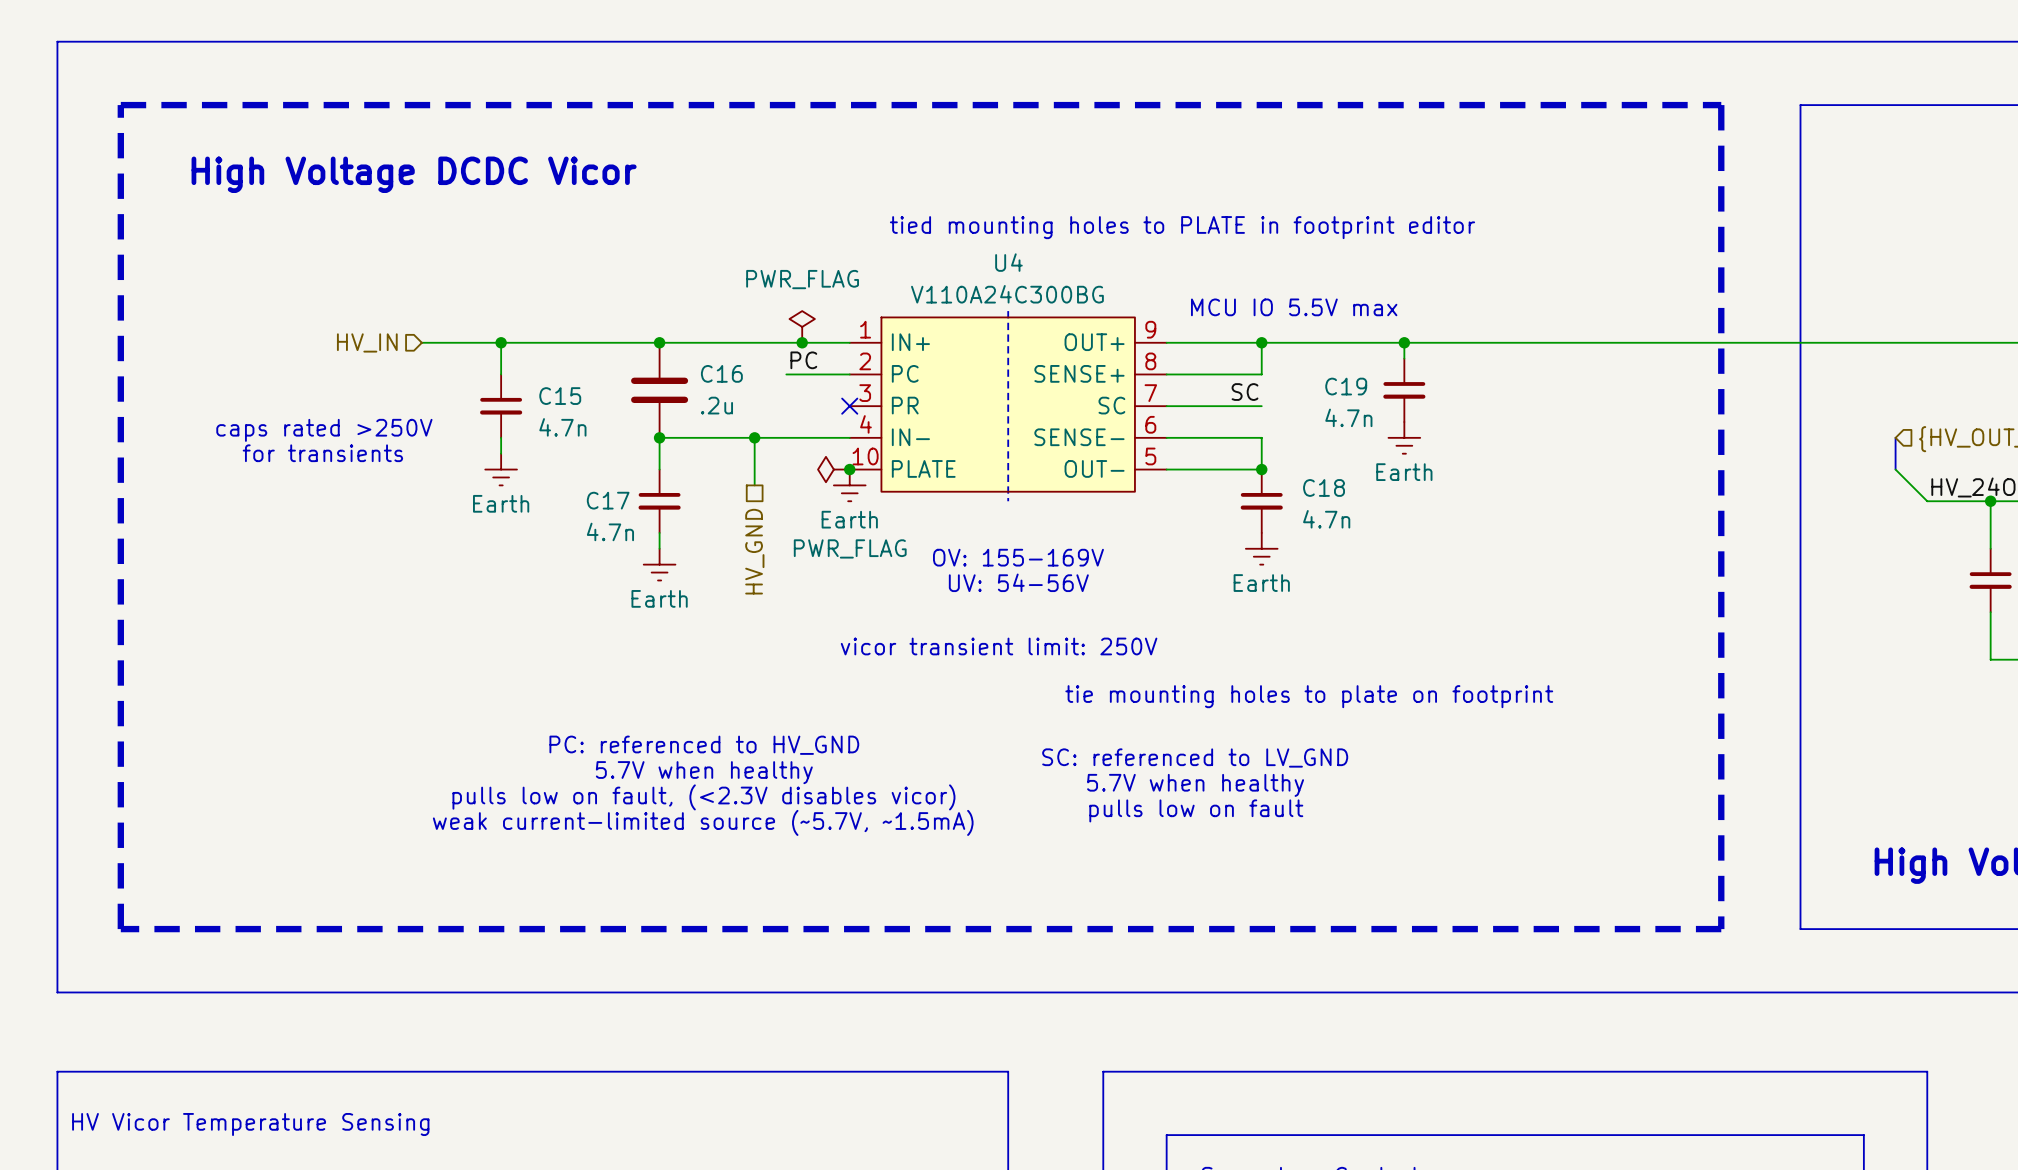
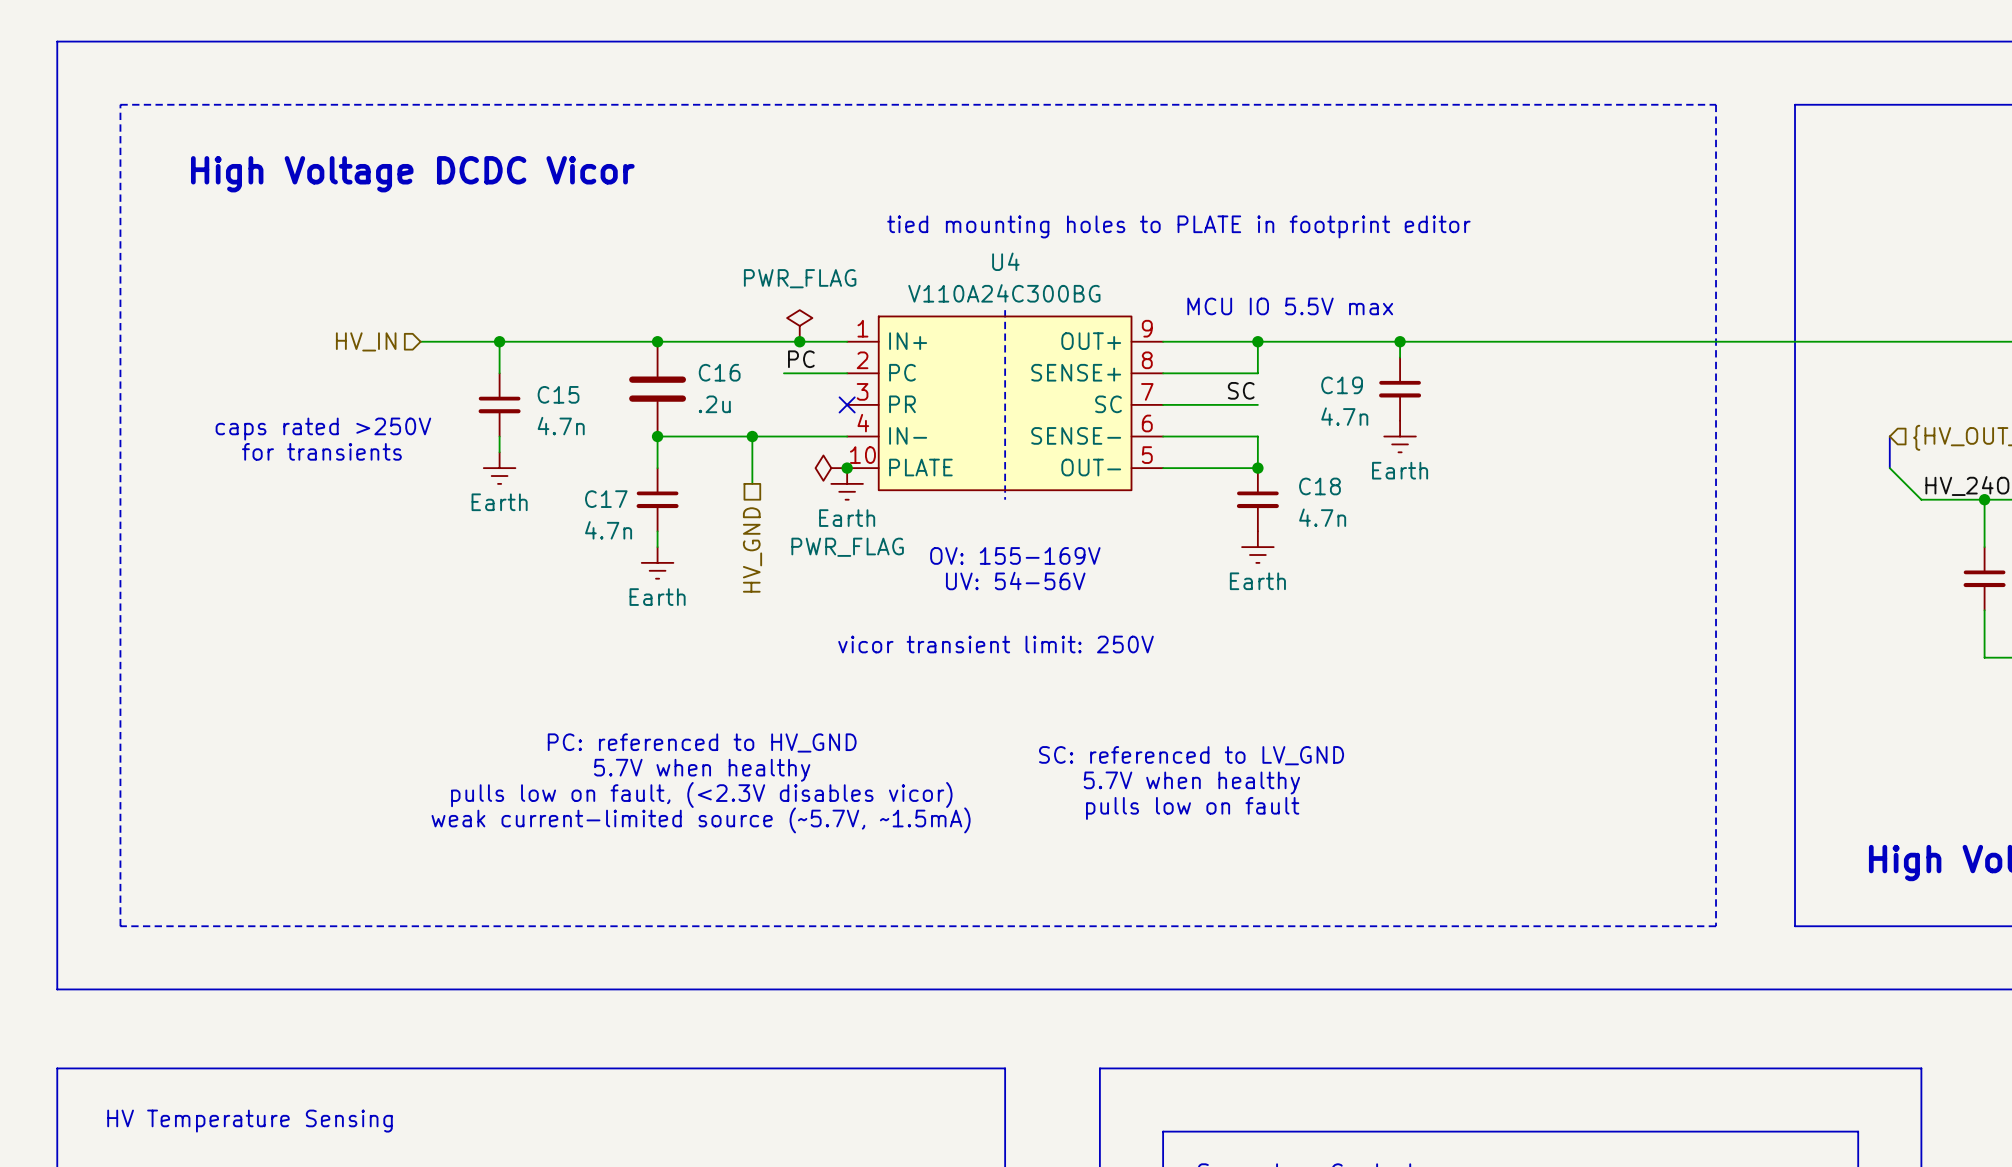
line width: thick (120, 105) (1721, 105) (1721, 929) (120, 929) (120, 105) -> thin (120, 104) (1716, 104) (1716, 926) (120, 926) (120, 104)
text: tie mounting holes to plate on footprint (1309, 696) -> none
text: HV Vicor Temperature Sensing (250, 1124) -> HV Temperature Sensing (249, 1121)

